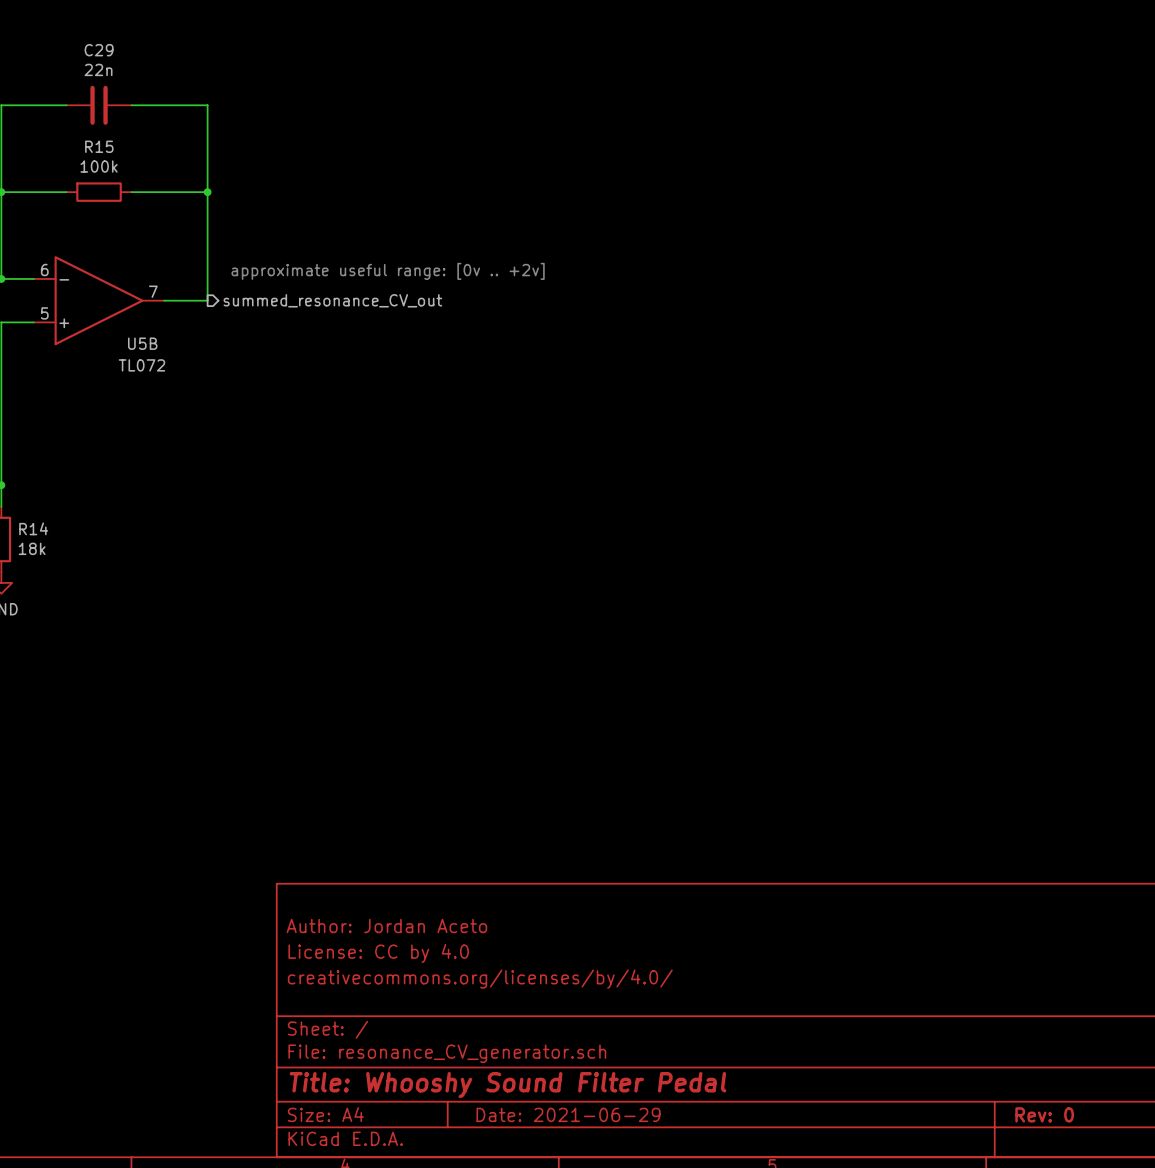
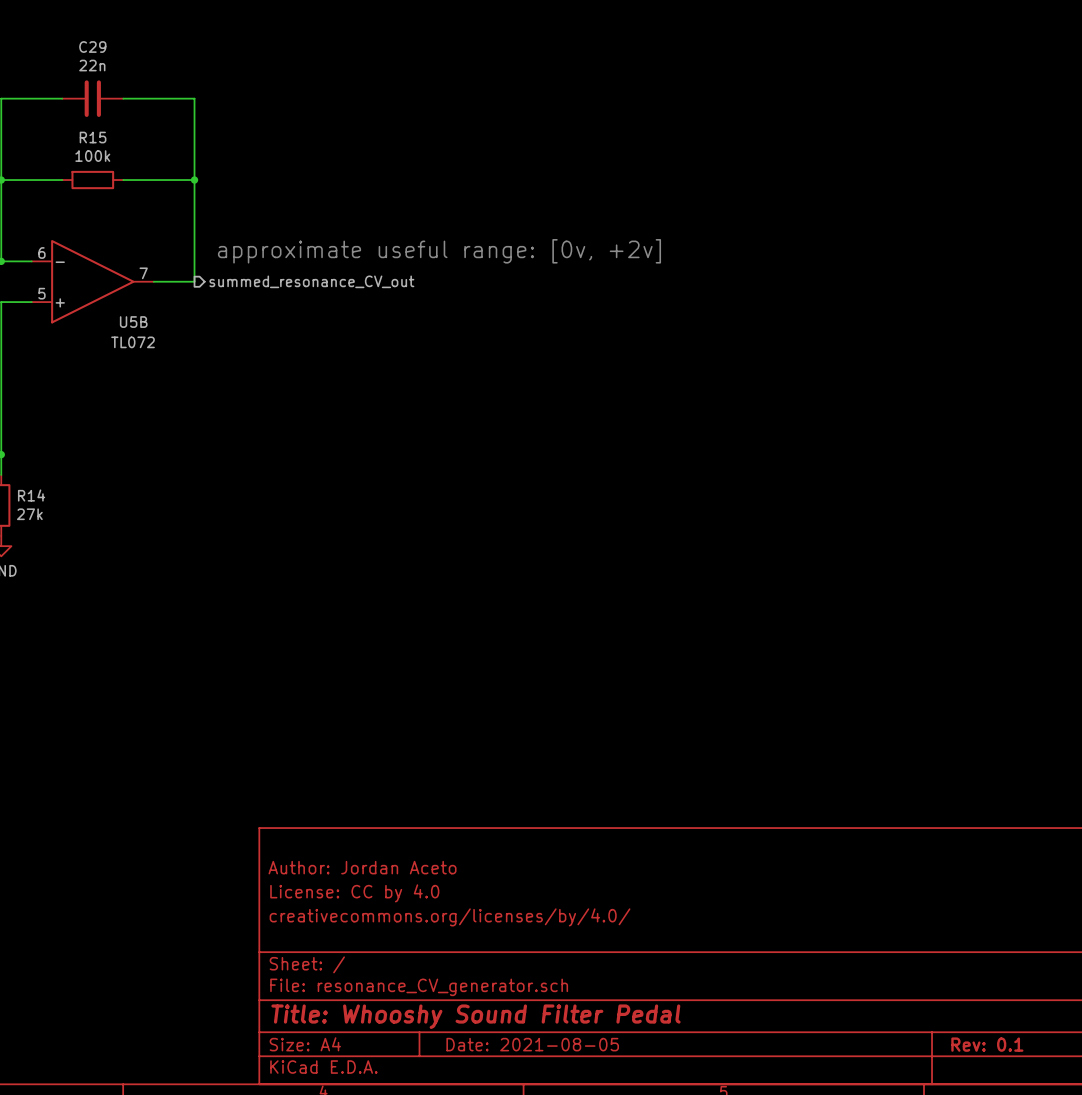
text: approximate useful range: [0v .. +2v] (388, 271) -> approximate useful range: [0v, +2v] (439, 251)
R14 value: 18k (32, 548) -> 27k (29, 514)
title block: Date: 2021-06-29 (568, 1114) -> Date: 2021-08-05 (532, 1044)
title block: Rev: 0 (1044, 1114) -> Rev: 0.1 (987, 1044)

